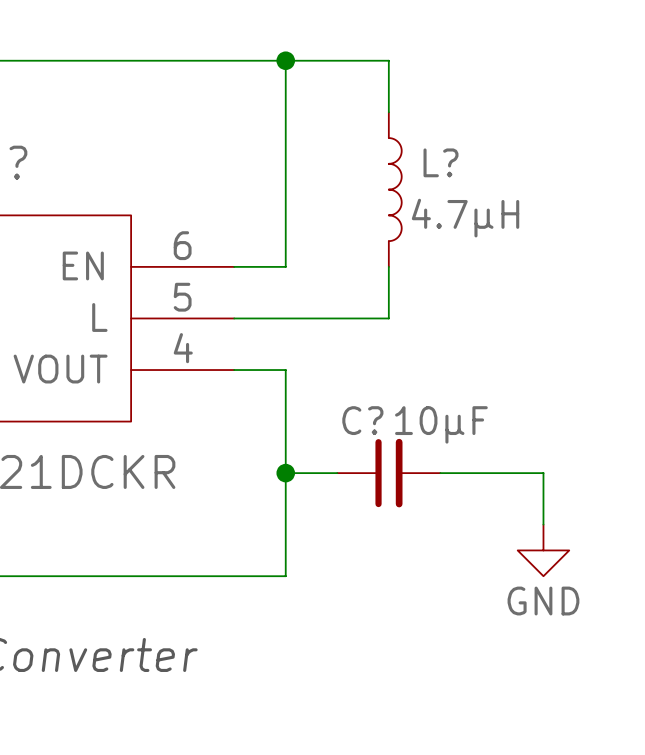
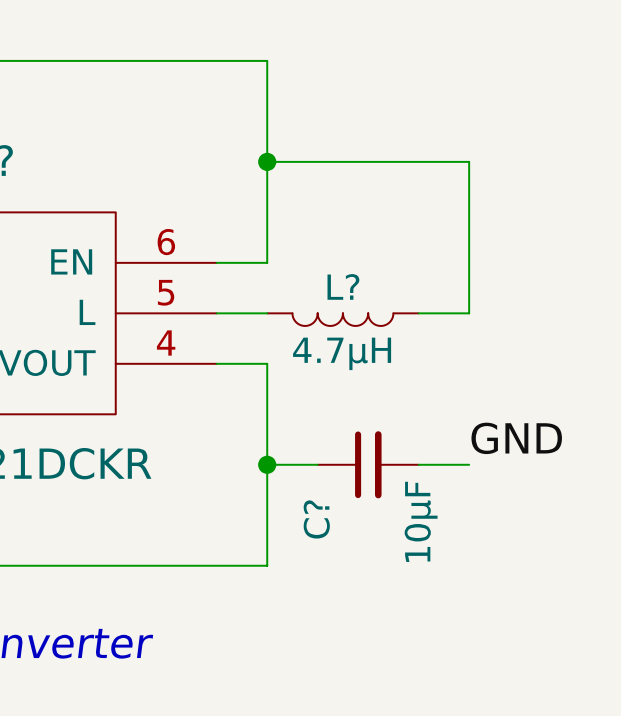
wire: (285, 60) (388, 60) (388, 112) -> none
junction position: (285, 60) -> (267, 161)
L? name position: L? (440, 162) -> L? (343, 286)
wire: none -> (267, 161) (469, 161) (469, 313) (418, 313)
L? rotation: 0° (395, 189) -> 90° clockwise (342, 319)
L? position: (395, 189) -> (342, 319)
L? value position: 4.7μH (465, 218) -> 4.7μH (342, 353)
wire: (388, 266) (388, 318) (285, 318) -> none
C? name rotation: 0° (362, 420) -> 90° counterclockwise (316, 519)
C? name position: C? (362, 420) -> C? (316, 519)
C? value rotation: 0° (441, 424) -> 90° counterclockwise (421, 521)
label: none -> GND (516, 438)
wire: (491, 473) (543, 473) (543, 524) -> none
power symbol: GND (543, 550) -> none

